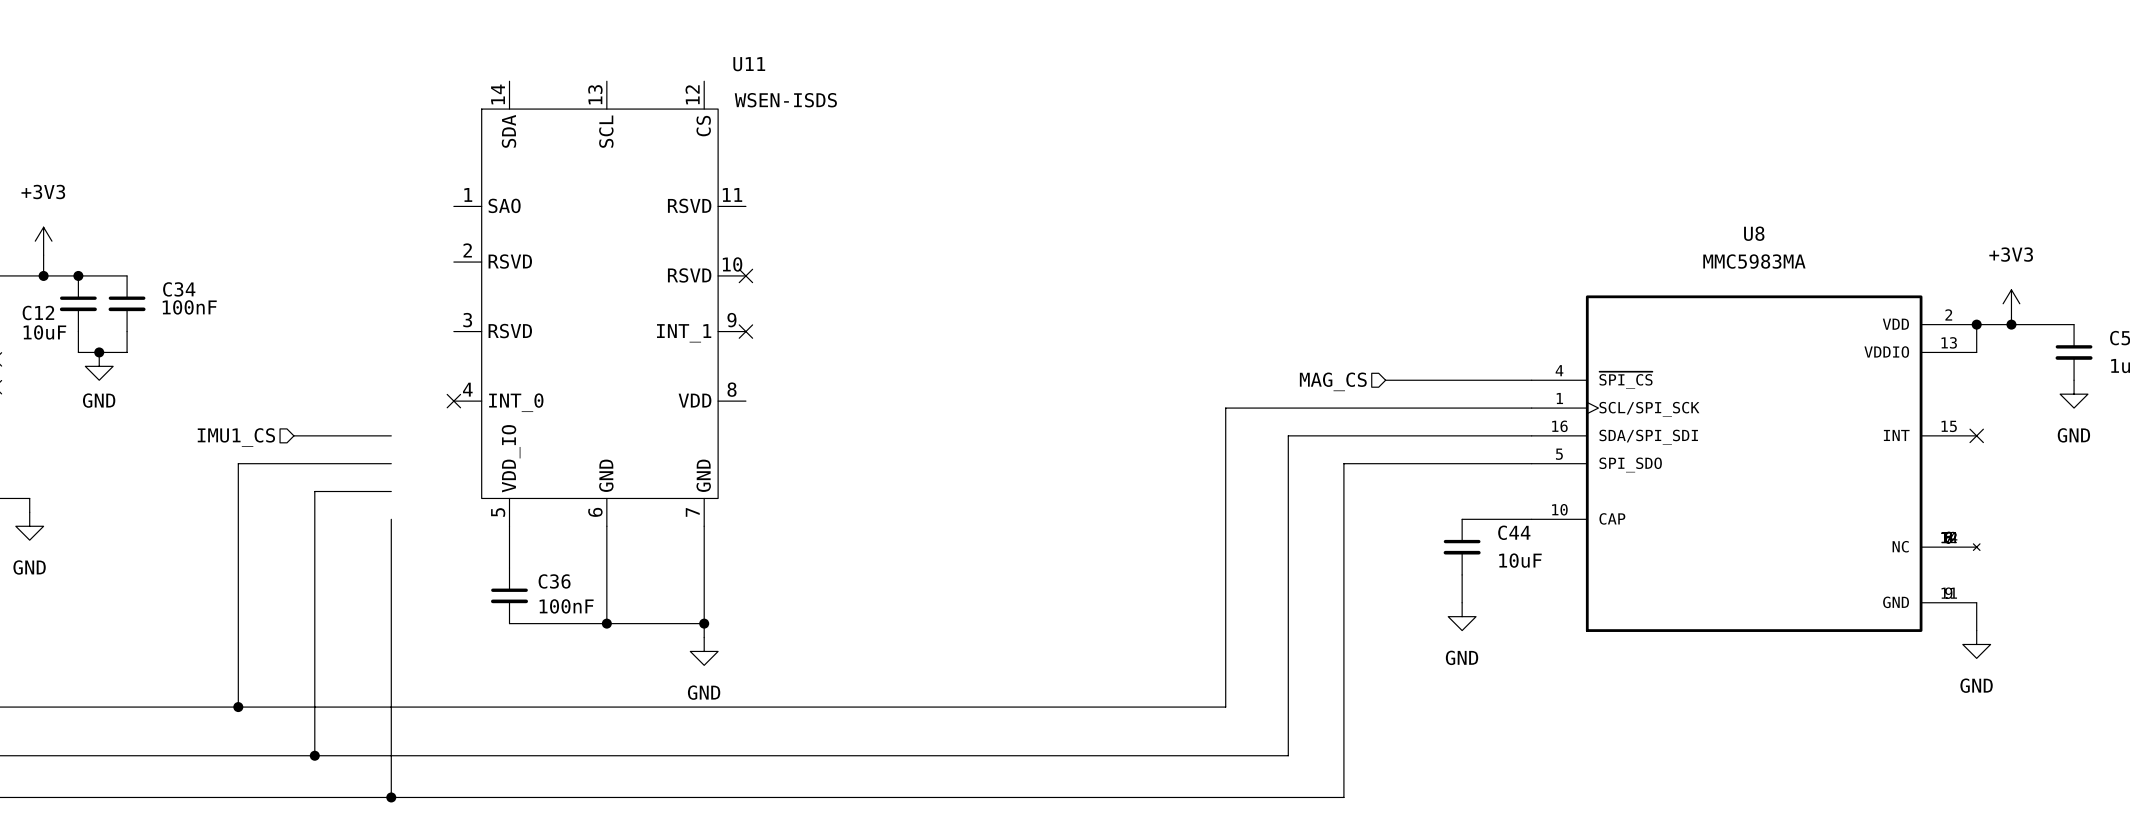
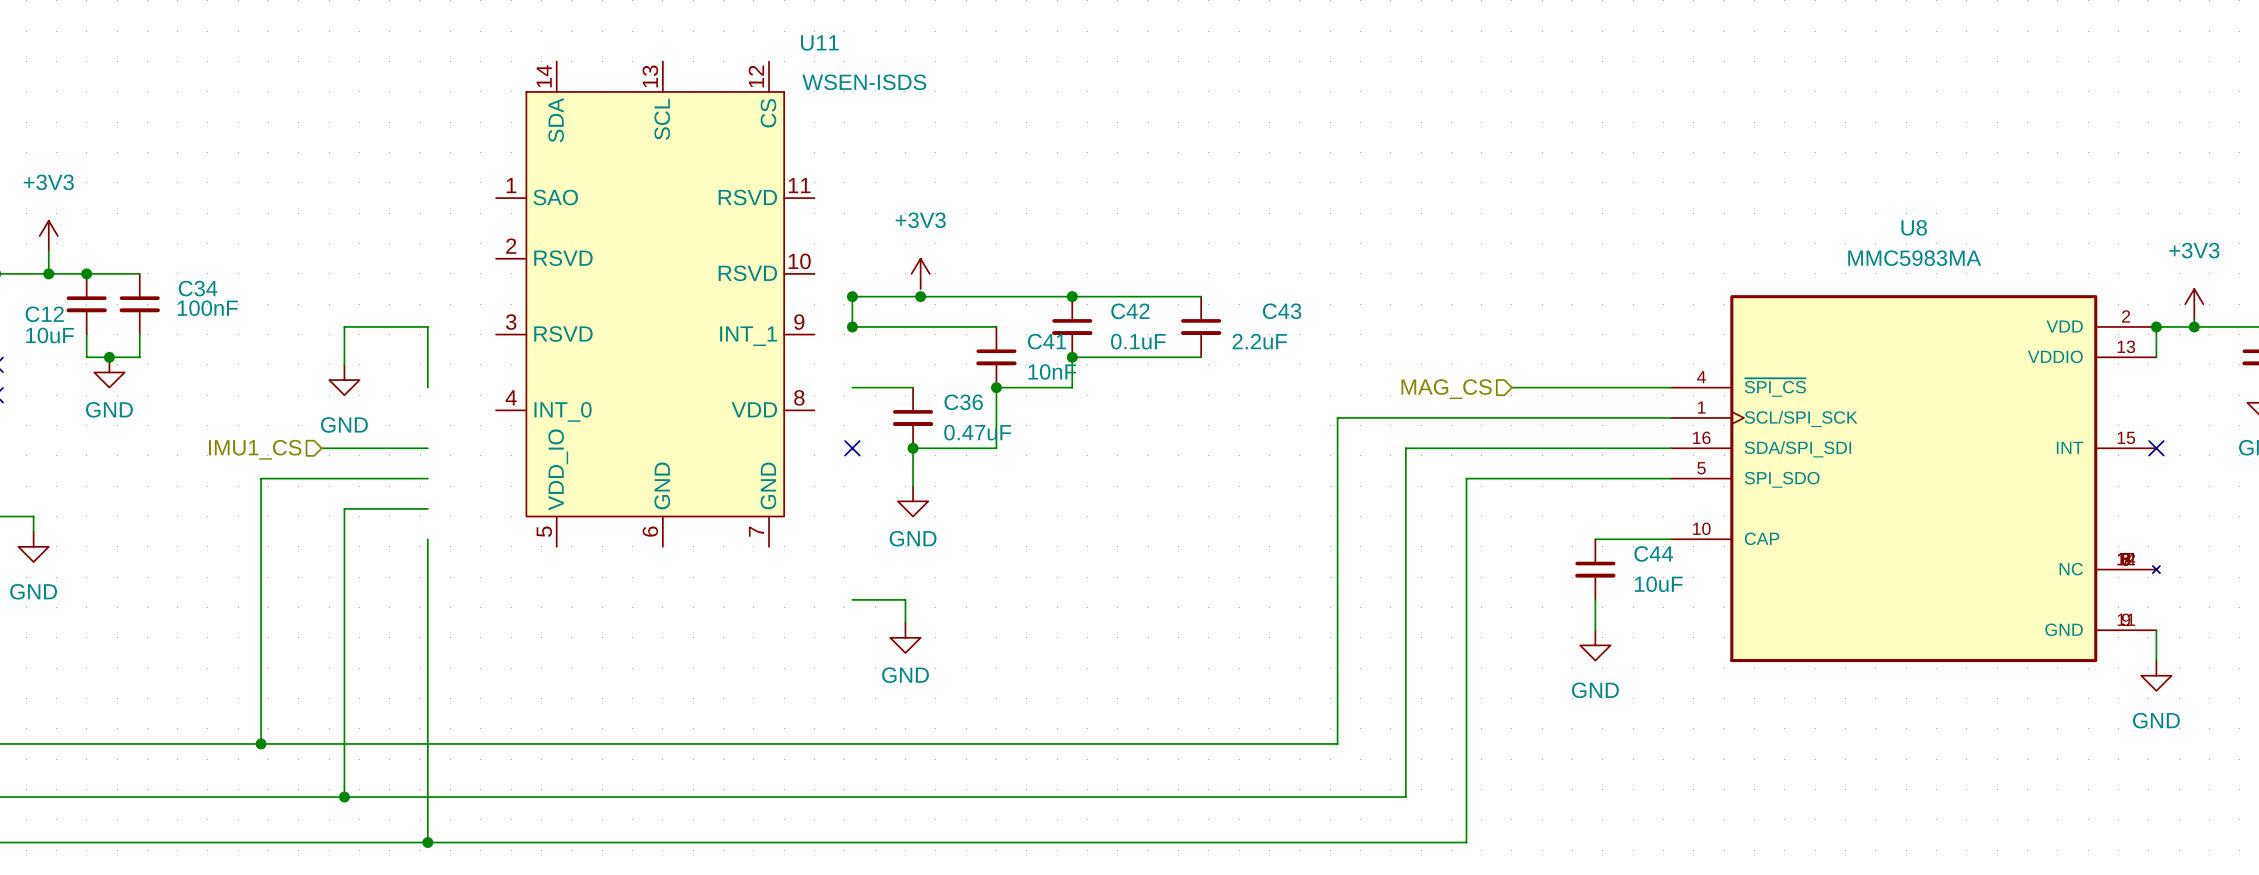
no-connect mark: (745, 275) -> none
power symbol: none -> +3V3 (920, 273)
junction: none -> (852, 296)
junction: none -> (920, 296)
junction: none -> (1072, 296)
wire: none -> (1201, 296) (852, 296) (852, 326) (996, 326)
junction: none -> (852, 326)
C42: none -> 0.1uF (1072, 326)
C43: none -> 2.2uF (1201, 326)
no-connect mark: (745, 331) -> none
C41: none -> 10nF (996, 357)
junction: none -> (1072, 357)
wire: none -> (1201, 357) (1072, 357) (1072, 387) (996, 387) (996, 448) (913, 448) (913, 486)
wire: none -> (344, 364) (344, 326) (427, 326) (427, 387)
power symbol: none -> GND (344, 380)
wire: none -> (852, 387) (913, 387)
junction: none -> (996, 387)
no-connect mark: (453, 401) -> none
no-connect mark: none -> (852, 448)
junction: none -> (913, 448)
power symbol: none -> GND (913, 501)
wire: (509, 526) (509, 567) -> none
wire: (606, 526) (606, 623) -> none
wire: (704, 526) (704, 637) -> none
wire: none -> (852, 599) (905, 599) (905, 622)
C36 position: (509, 595) -> (913, 417)
C36 value: 100nF (566, 606) -> 0.47uF (977, 432)
power symbol: none -> GND (905, 637)
wire: (509, 623) (704, 623) -> none
junction: (606, 623) -> none
junction: (704, 623) -> none
power symbol: GND (704, 651) -> none

